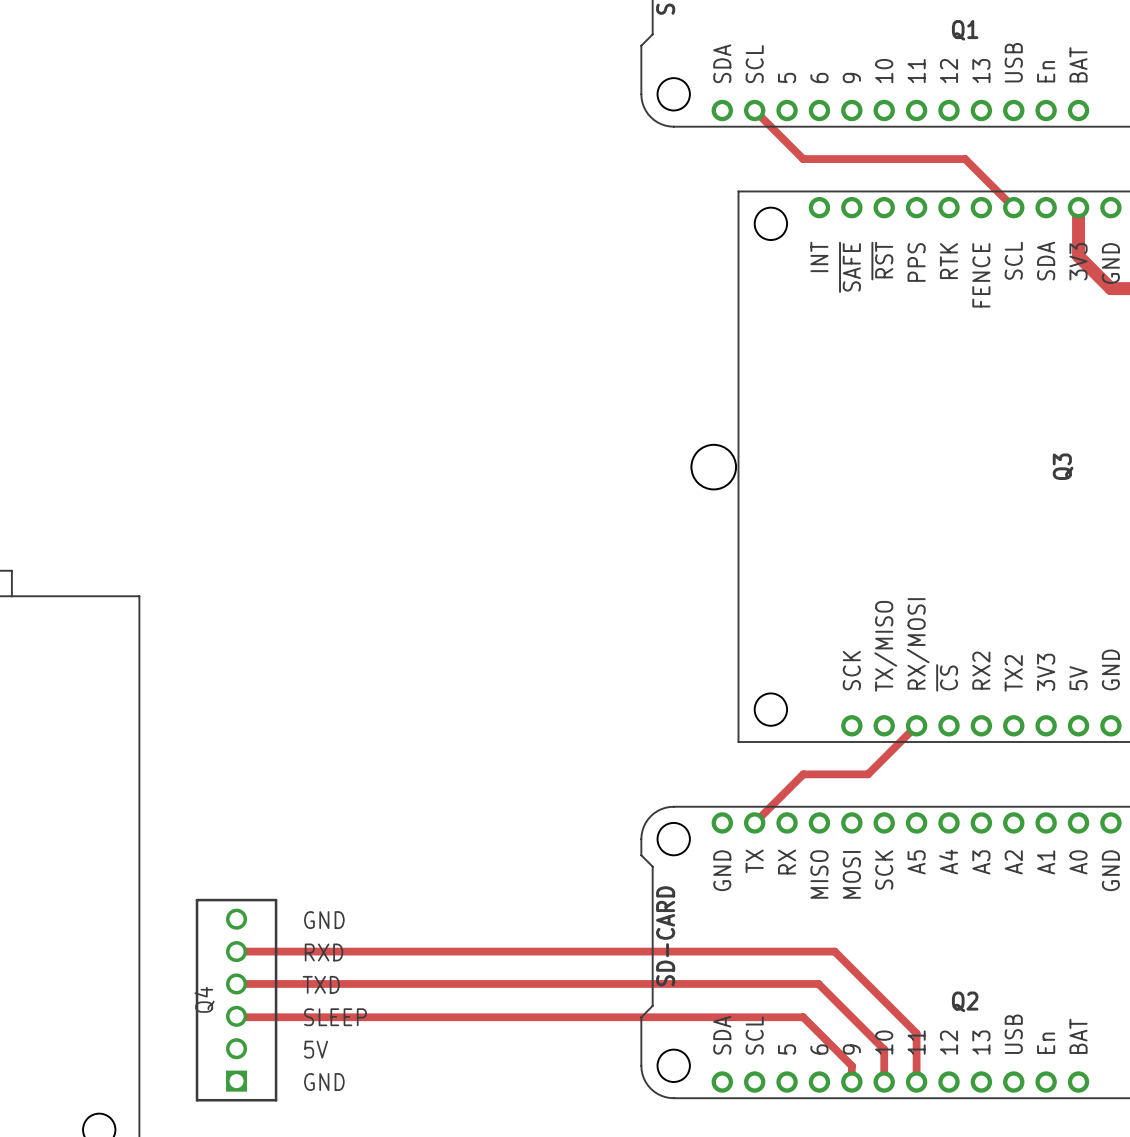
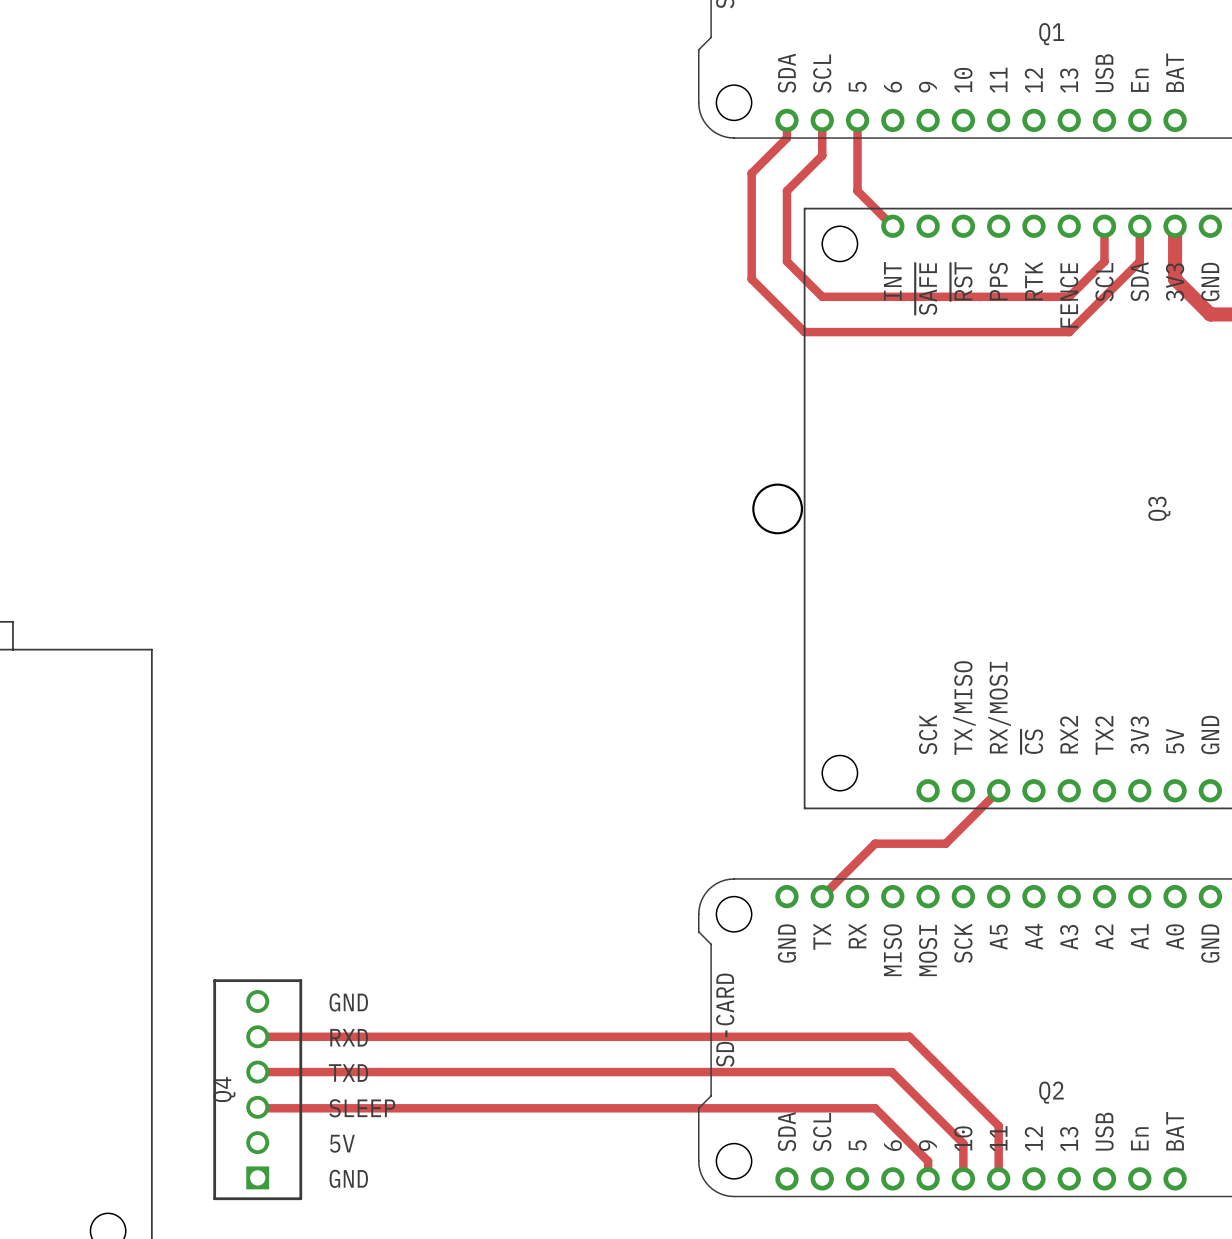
track: none -> (786, 120) (786, 138) (751, 173) (751, 279) (804, 332) (1069, 332) (1139, 261) (1139, 226)
track: (754, 110) (803, 159) (965, 159) (1013, 207) -> (822, 120) (822, 155) (786, 190) (786, 261) (822, 296) (1069, 296) (1104, 261) (1104, 226)
track: none -> (857, 120) (857, 190) (892, 226)

